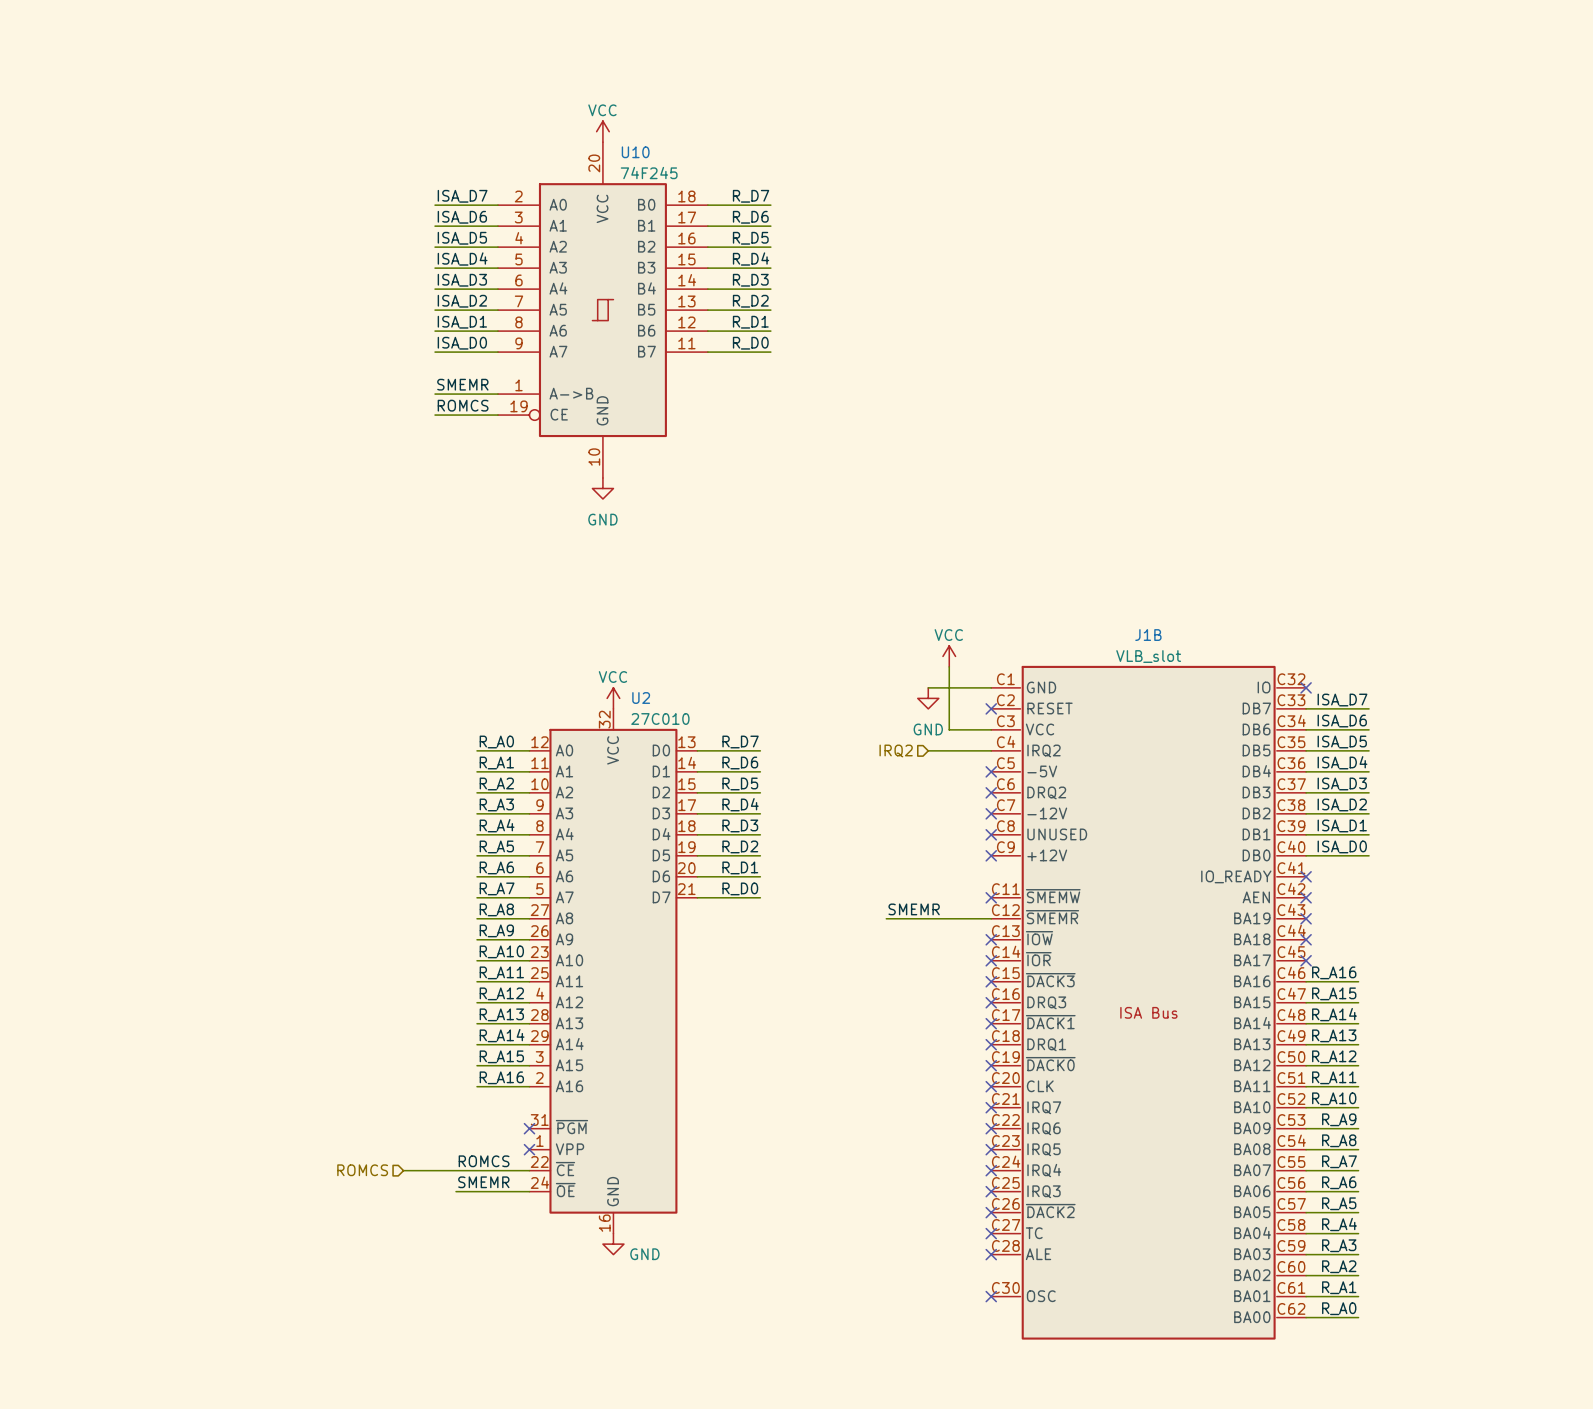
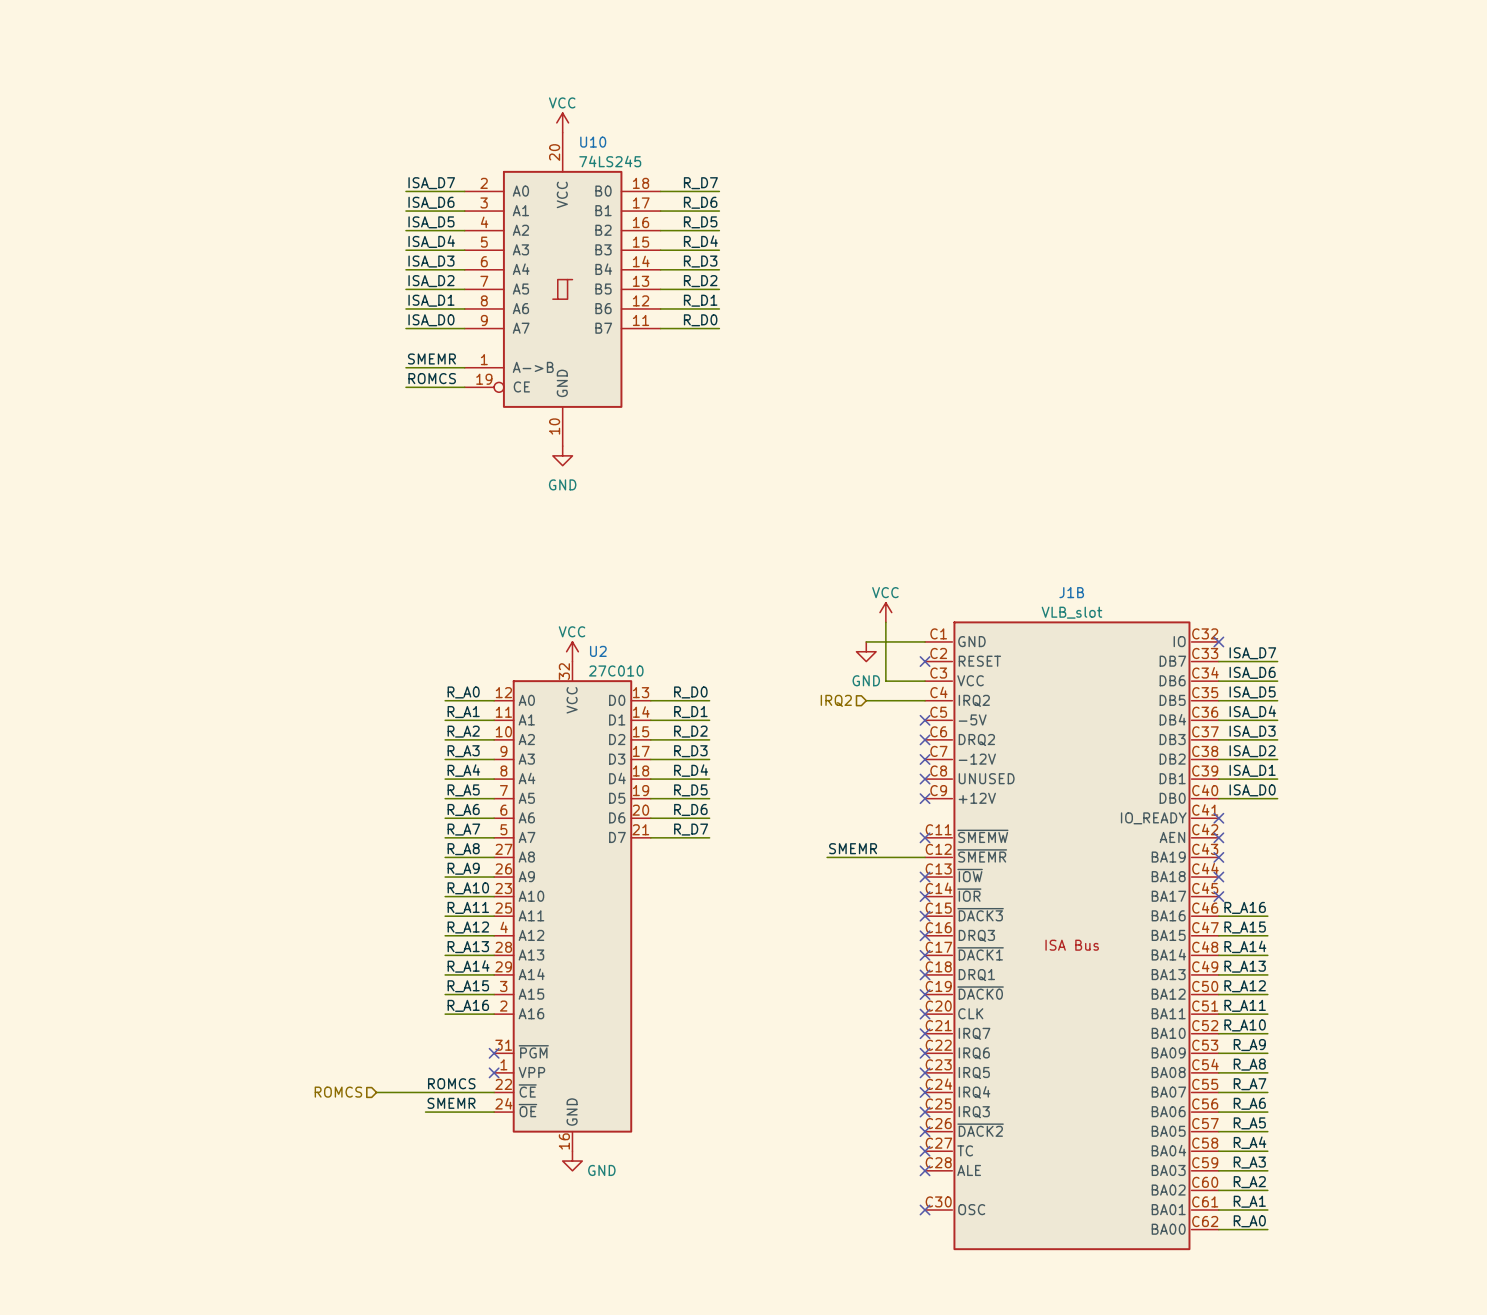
U10 value: 74F245 (649, 173) -> 74LS245 (610, 161)
label: R_D7 (740, 742) -> R_D0 (690, 692)
label: R_D6 (740, 762) -> R_D1 (690, 712)
label: R_D5 (740, 783) -> R_D2 (690, 731)
label: R_D4 (740, 804) -> R_D3 (690, 751)
label: R_D3 (740, 825) -> R_D4 (691, 770)
label: R_D2 (740, 846) -> R_D5 (690, 790)
label: R_D1 (740, 867) -> R_D6 (690, 809)
label: R_D0 (740, 888) -> R_D7 (691, 829)

